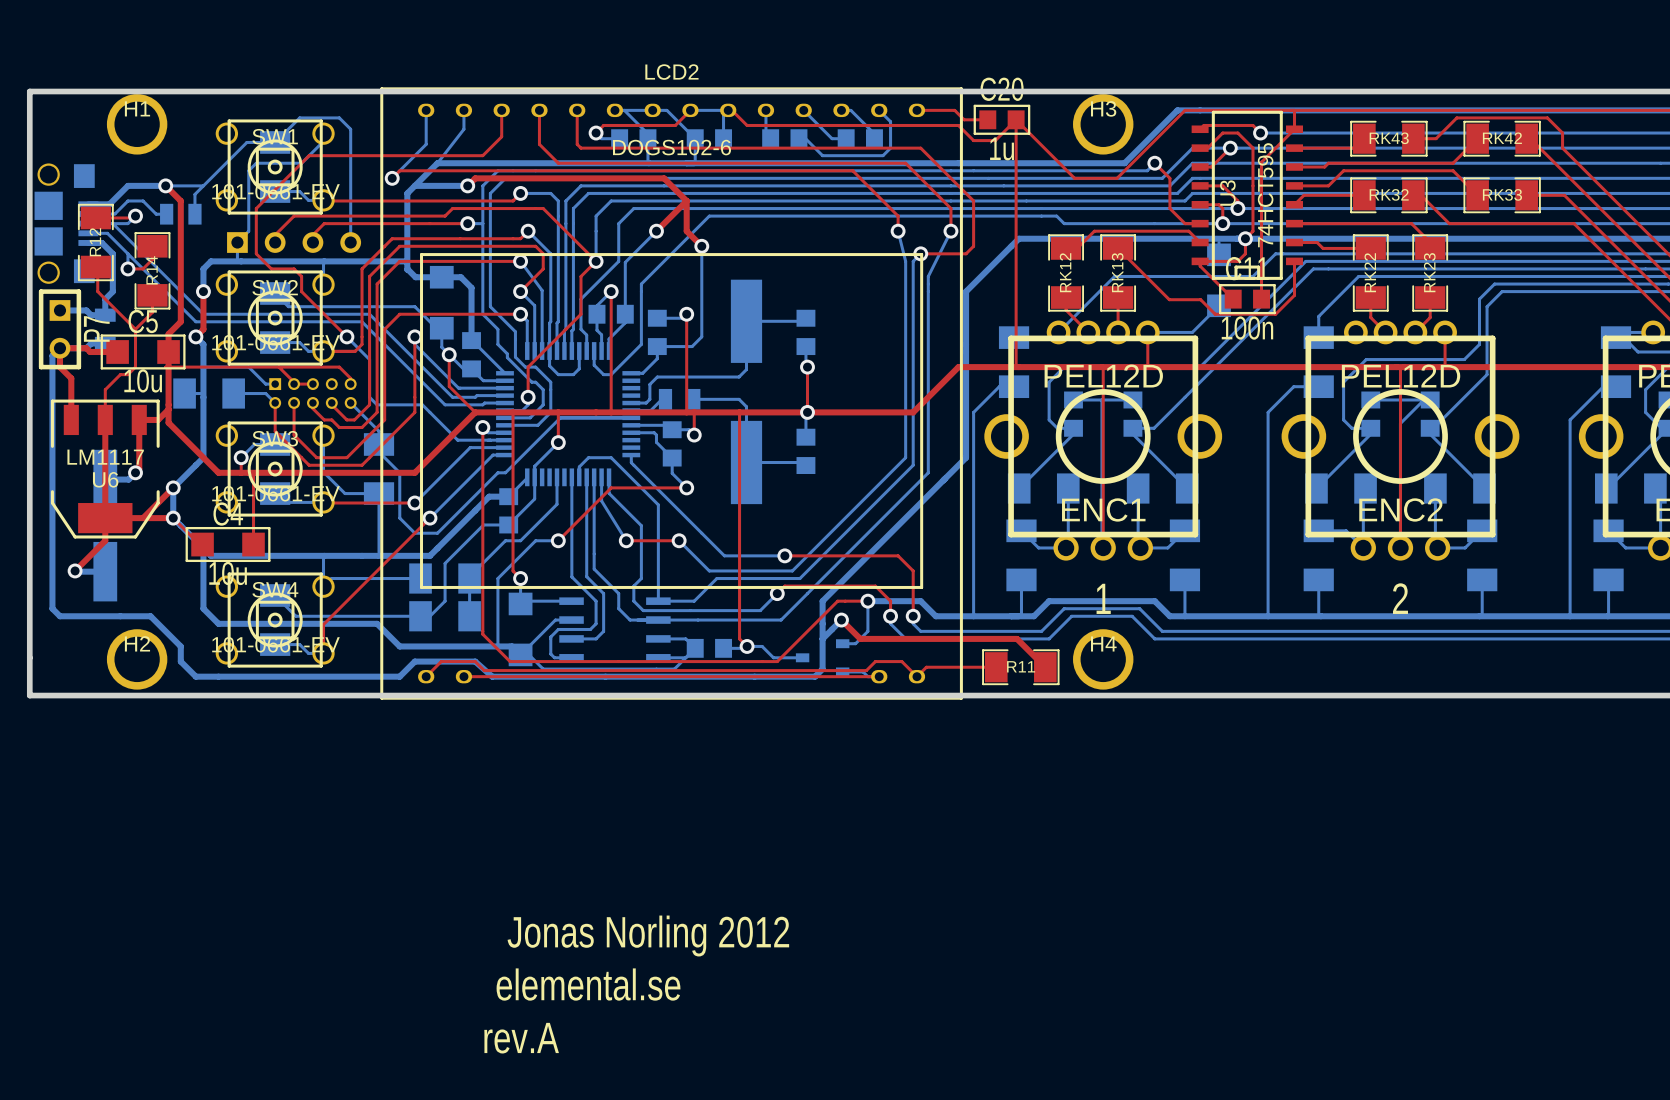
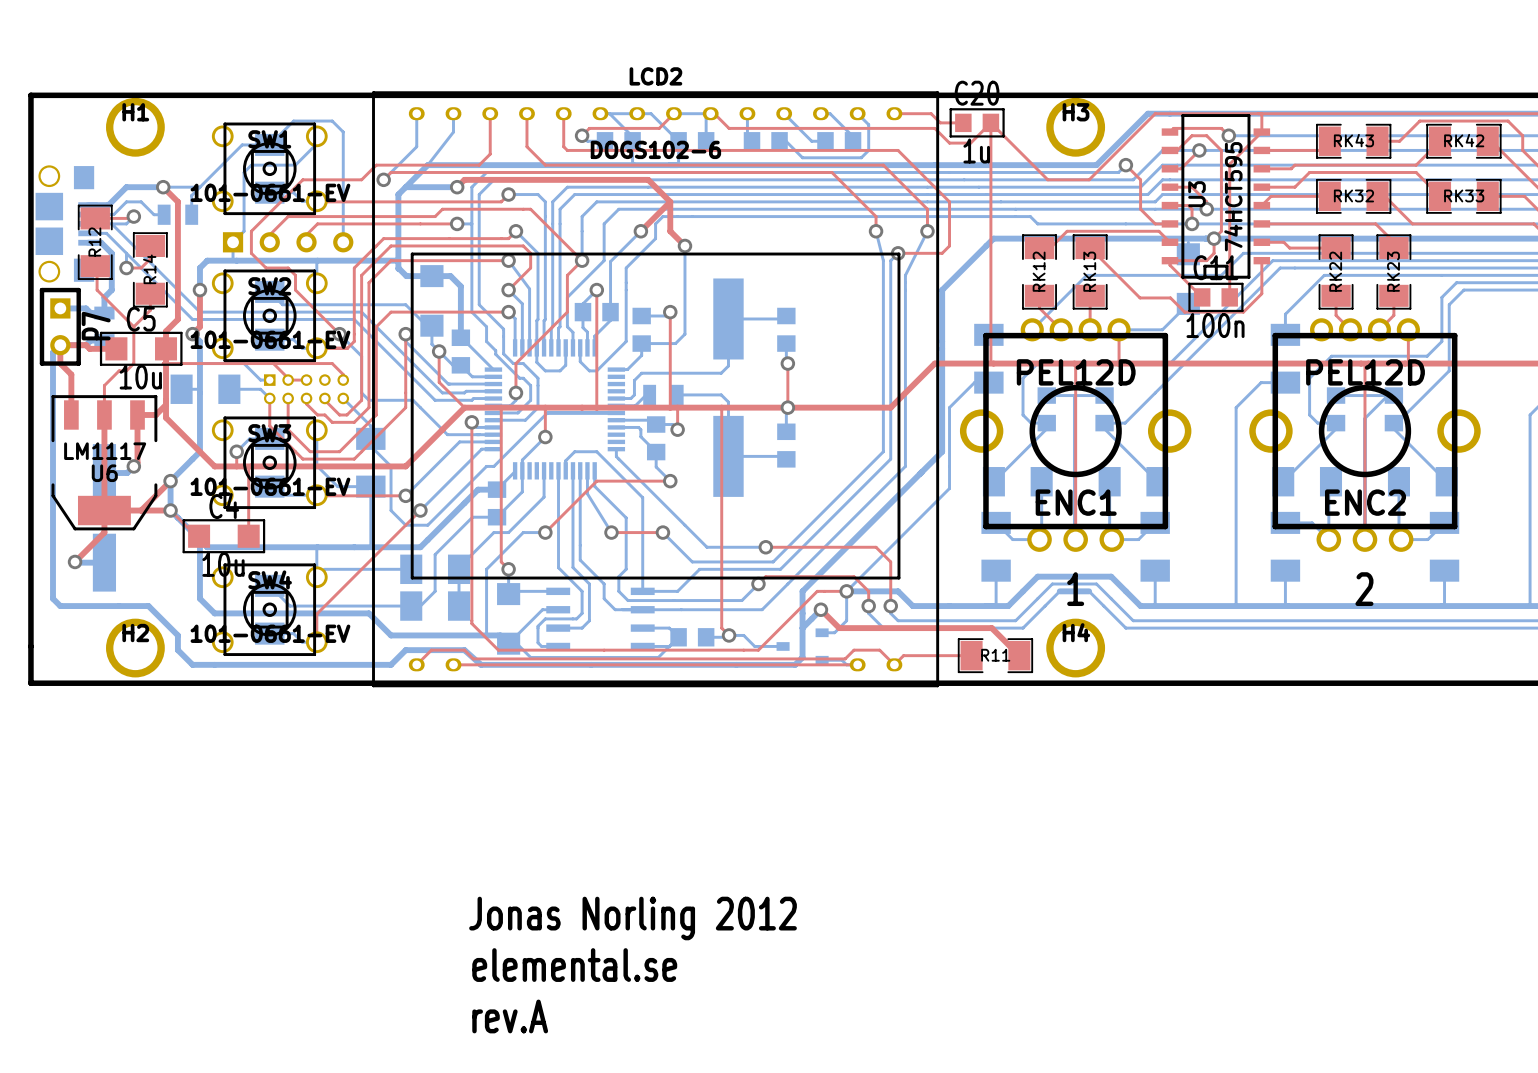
top track: (501, 136) (482, 155) (309, 155) (256, 208) (256, 231) -> (490, 139) (490, 154) (479, 165) (376, 165) (361, 179) (302, 179) (251, 231)
bottom track: (709, 216) (641, 284) -> (692, 216) (662, 216) (655, 223) (655, 238) (626, 268) (626, 282)
bottom track: (973, 495) (973, 616) -> (949, 488) (846, 591)
bottom track: (1049, 601) (1086, 601) -> (1045, 606) (1059, 591)
bottom track: none -> (1023, 591) (1037, 576) (1111, 576) (1125, 591)
bottom track: (1117, 601) (1154, 601) -> (1089, 591) (1103, 606)
bottom track: (1064, 608) (1139, 608) -> (1037, 598) (1052, 584) (1096, 584) (1111, 598)
bottom track: (1071, 616) (1132, 616) -> none

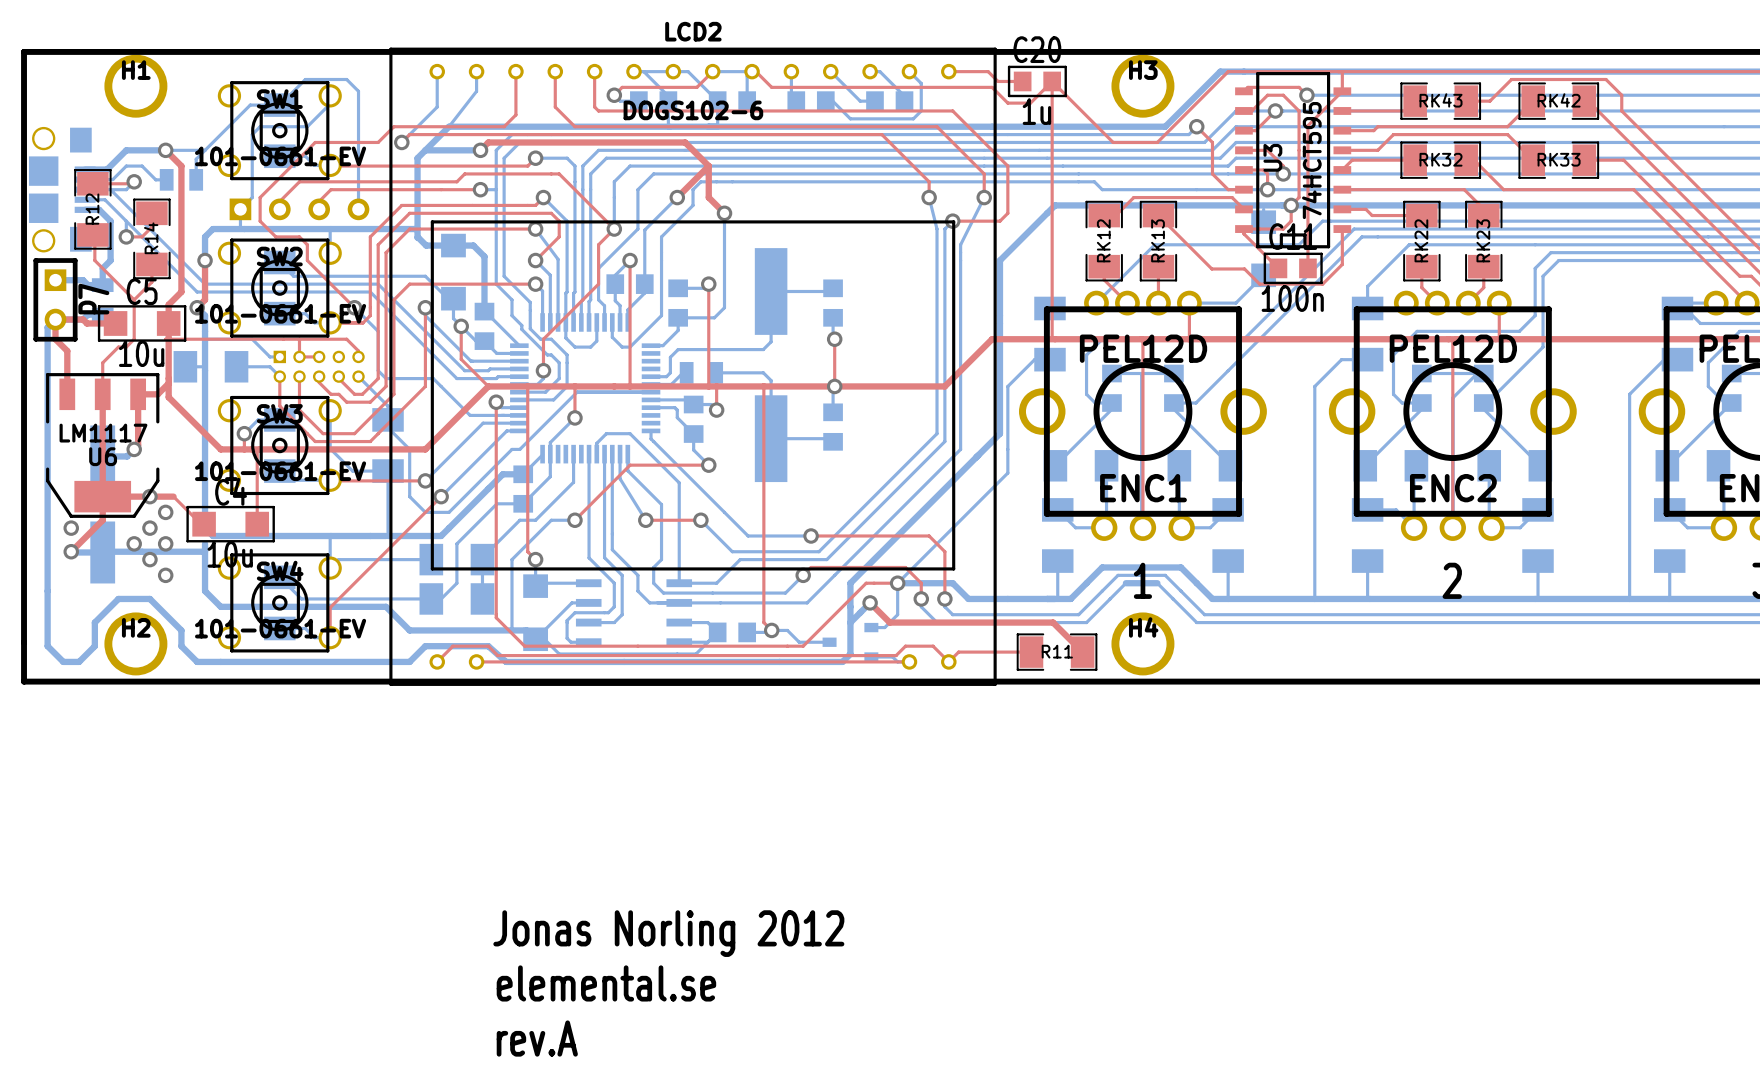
LCD2 footprint: [372, 91, 940, 688] -> [389, 47, 997, 686]
top track: (273, 363) (288, 378) -> (299, 339) (299, 354)
bottom track: (199, 451) (170, 481) (170, 510) (199, 539) (199, 554) -> (205, 433) (205, 528)
top track: (170, 481) (141, 510) -> none
via: (170, 481) -> none
via: none -> (149, 496)
via: (170, 510) -> none
via: none -> (165, 512)
via: none -> (71, 528)
via: none -> (149, 528)
via: none -> (134, 543)
via: none -> (165, 543)
bottom track: none -> (205, 551) (102, 552)
via: none -> (149, 559)
via: none -> (165, 575)
bottom track: (53, 598) (60, 606) (119, 606) -> (47, 591) (47, 646) (63, 661) (79, 661) (94, 646) (94, 622) (118, 598)

